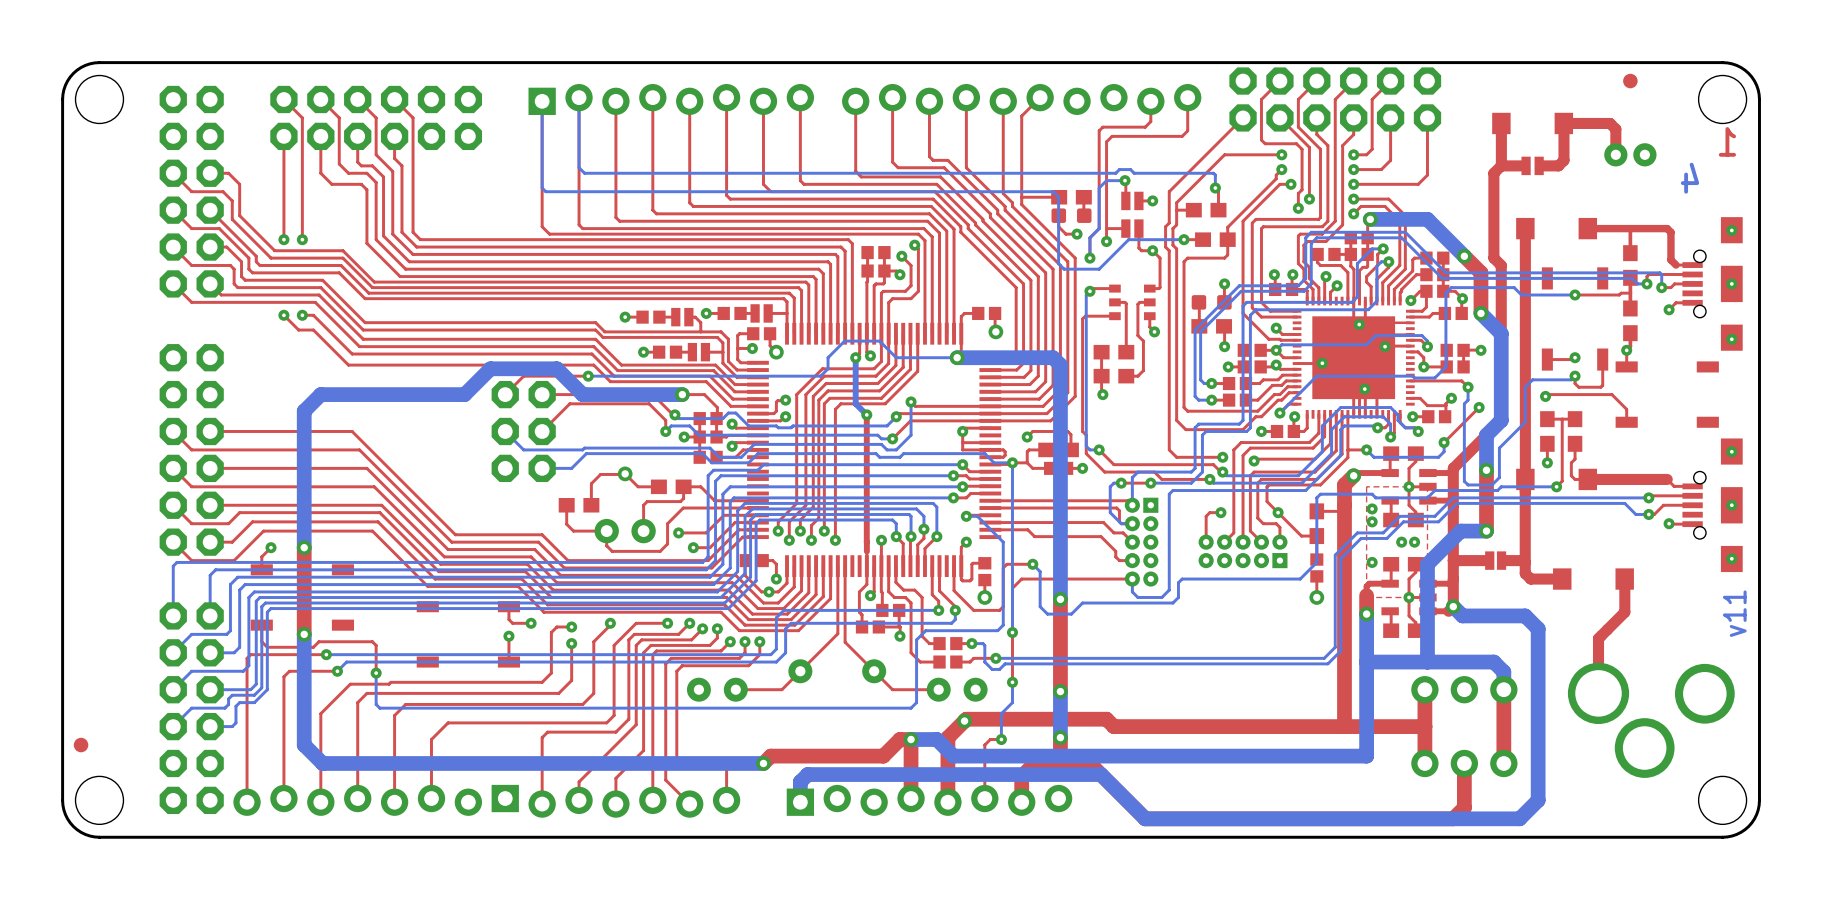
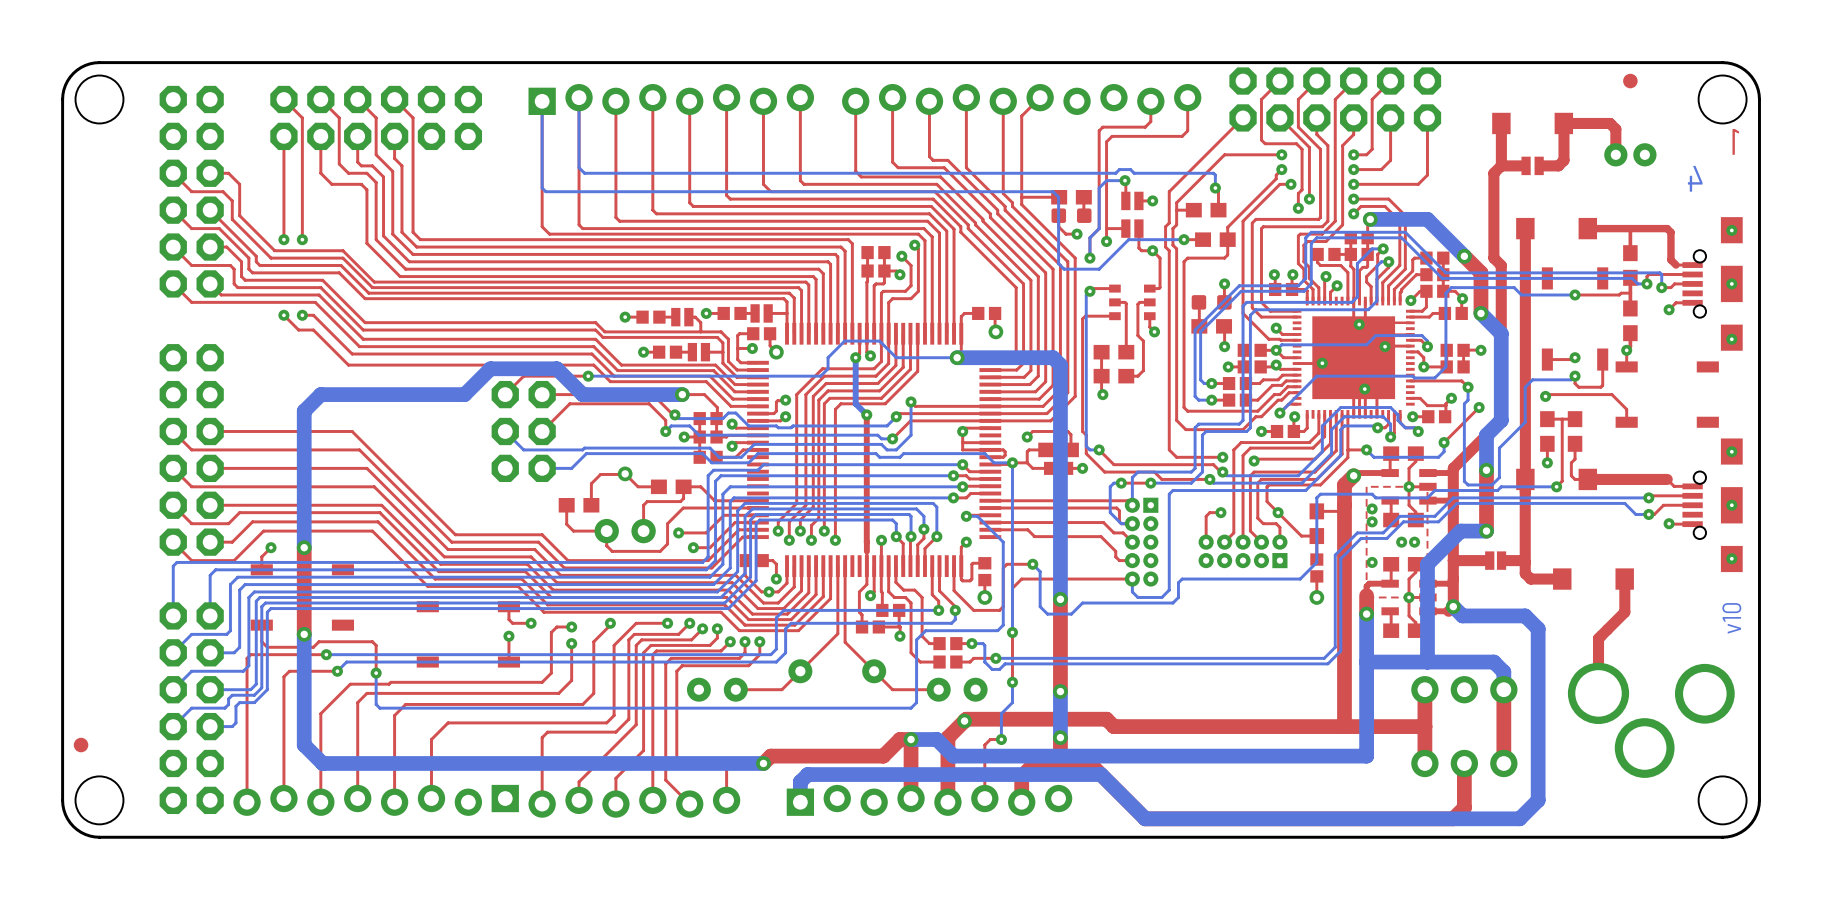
drawing: none -> [1722, 603, 1742, 634]
text: v11 (1734, 613) -> none

